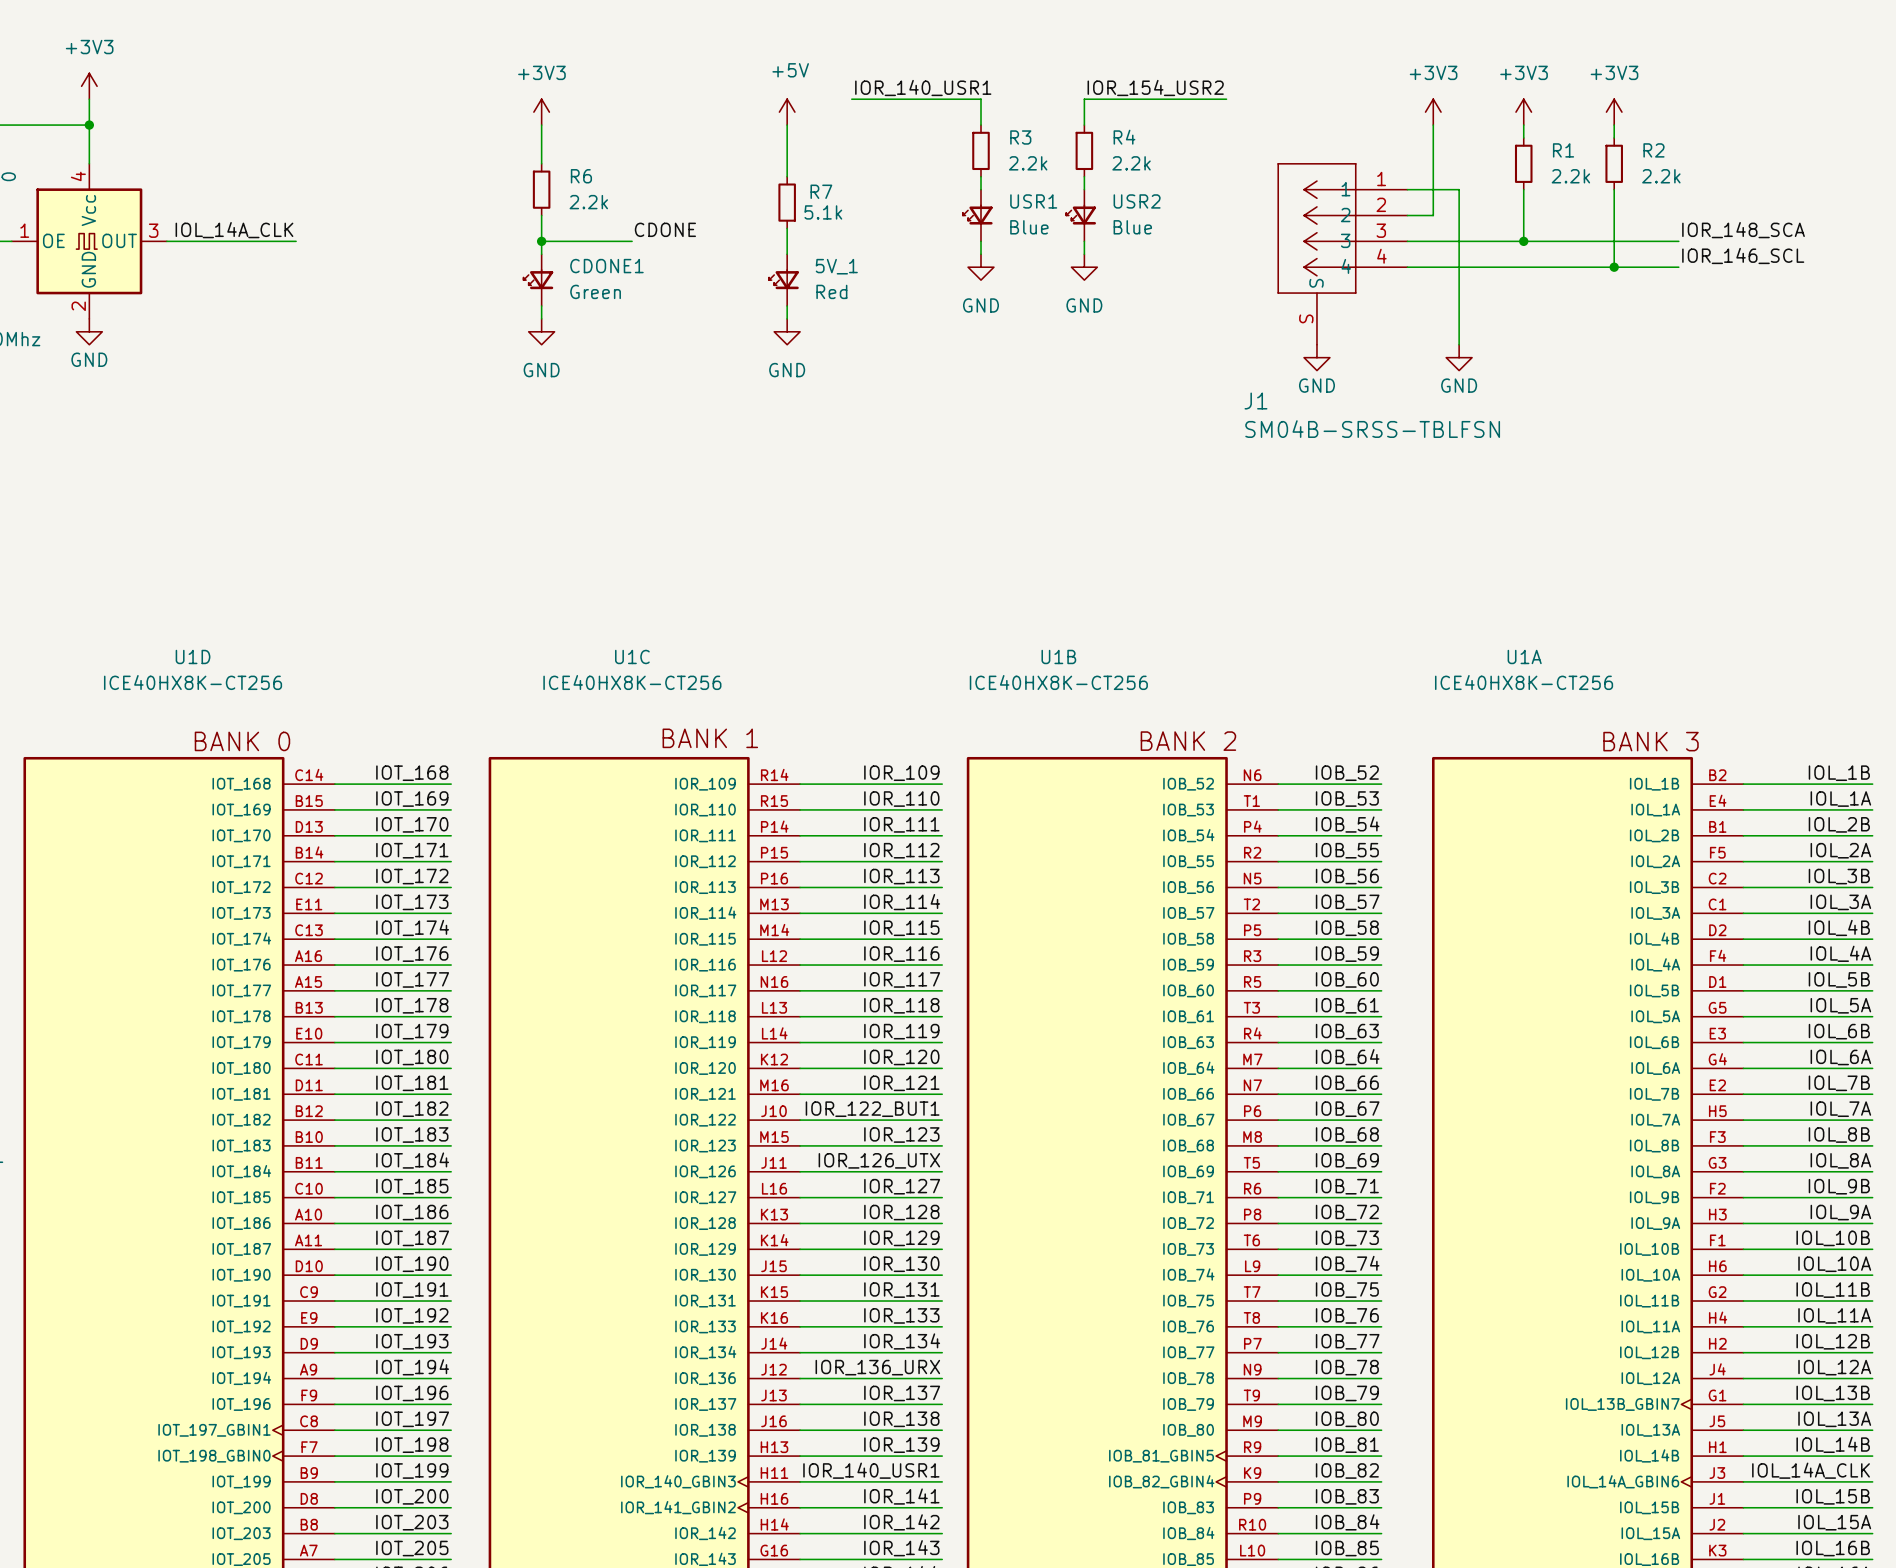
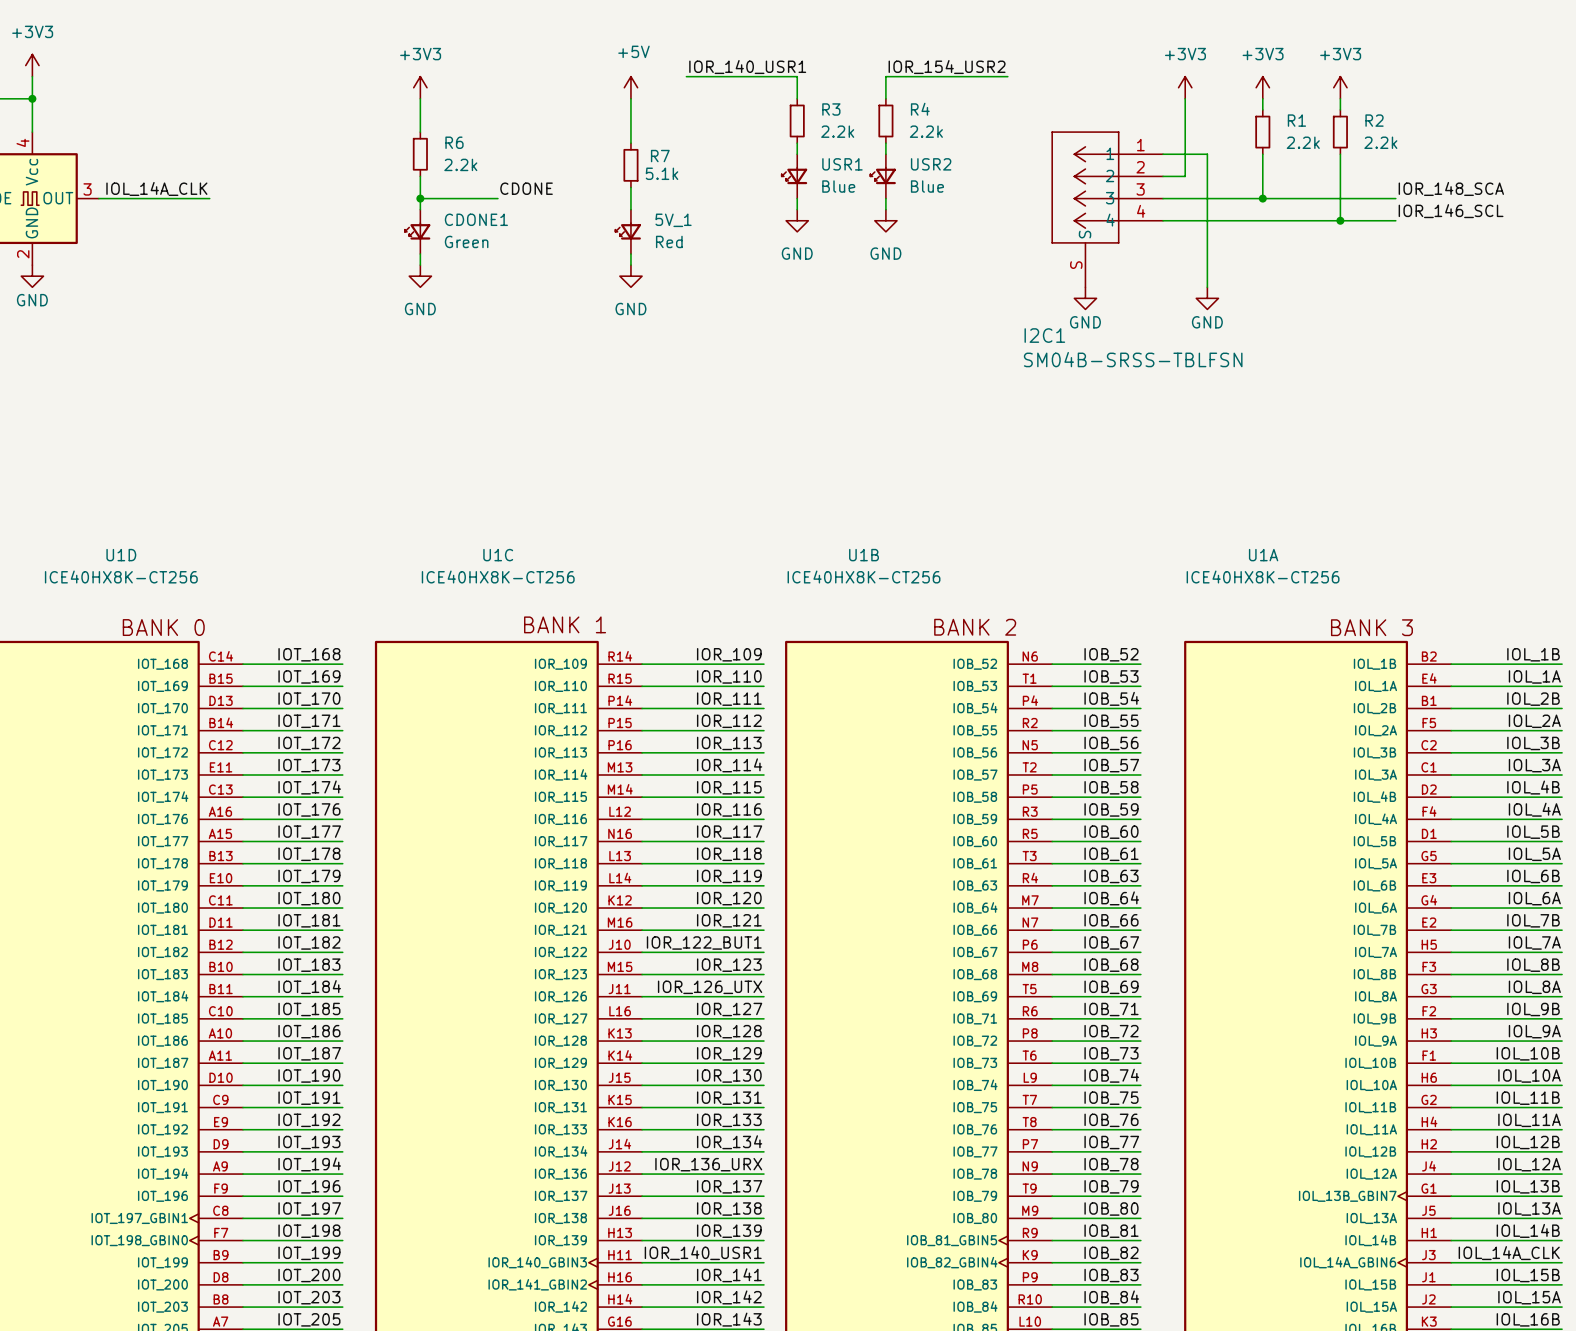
J1 name: J1 (1255, 401) -> I2C1 (1044, 335)

